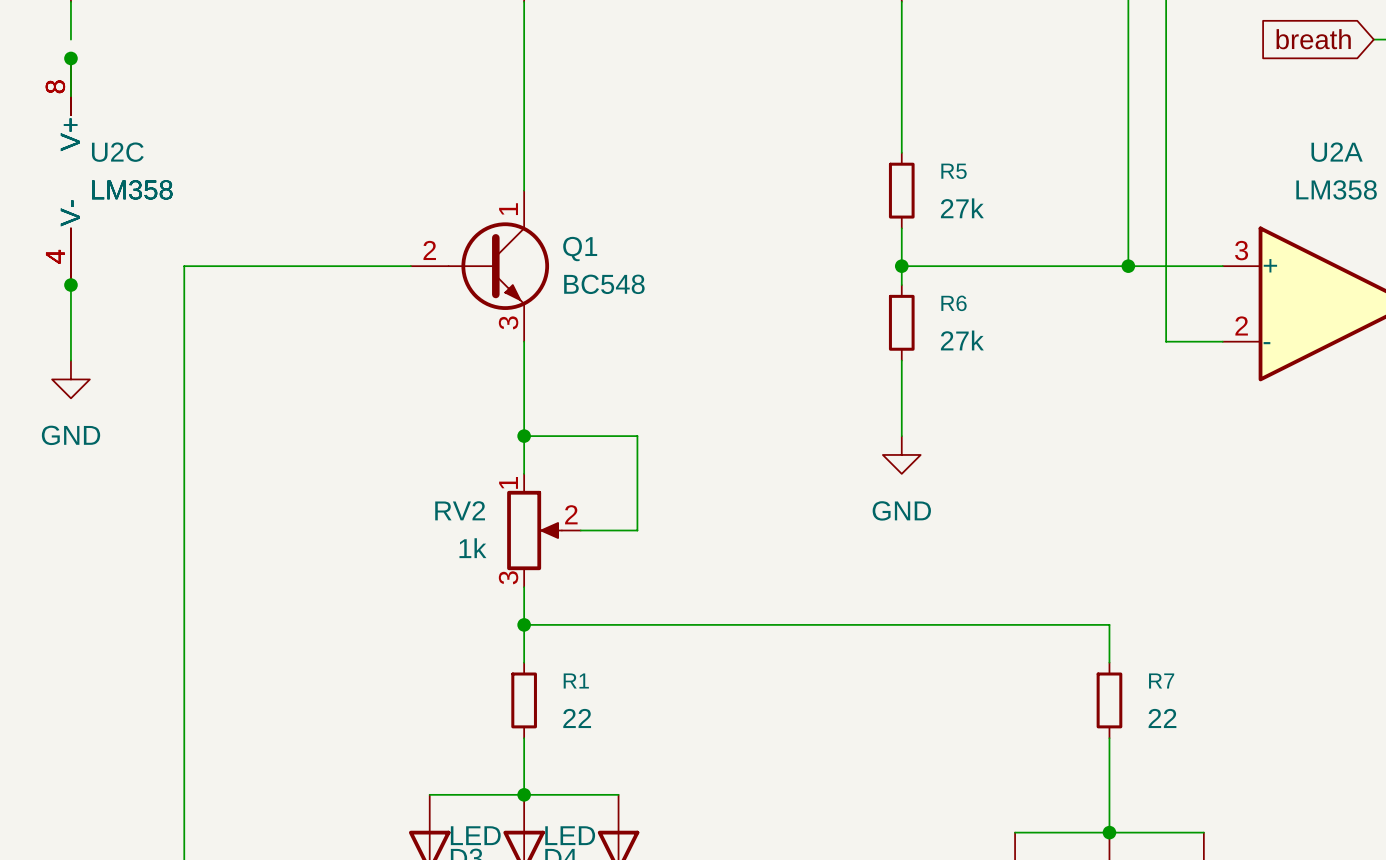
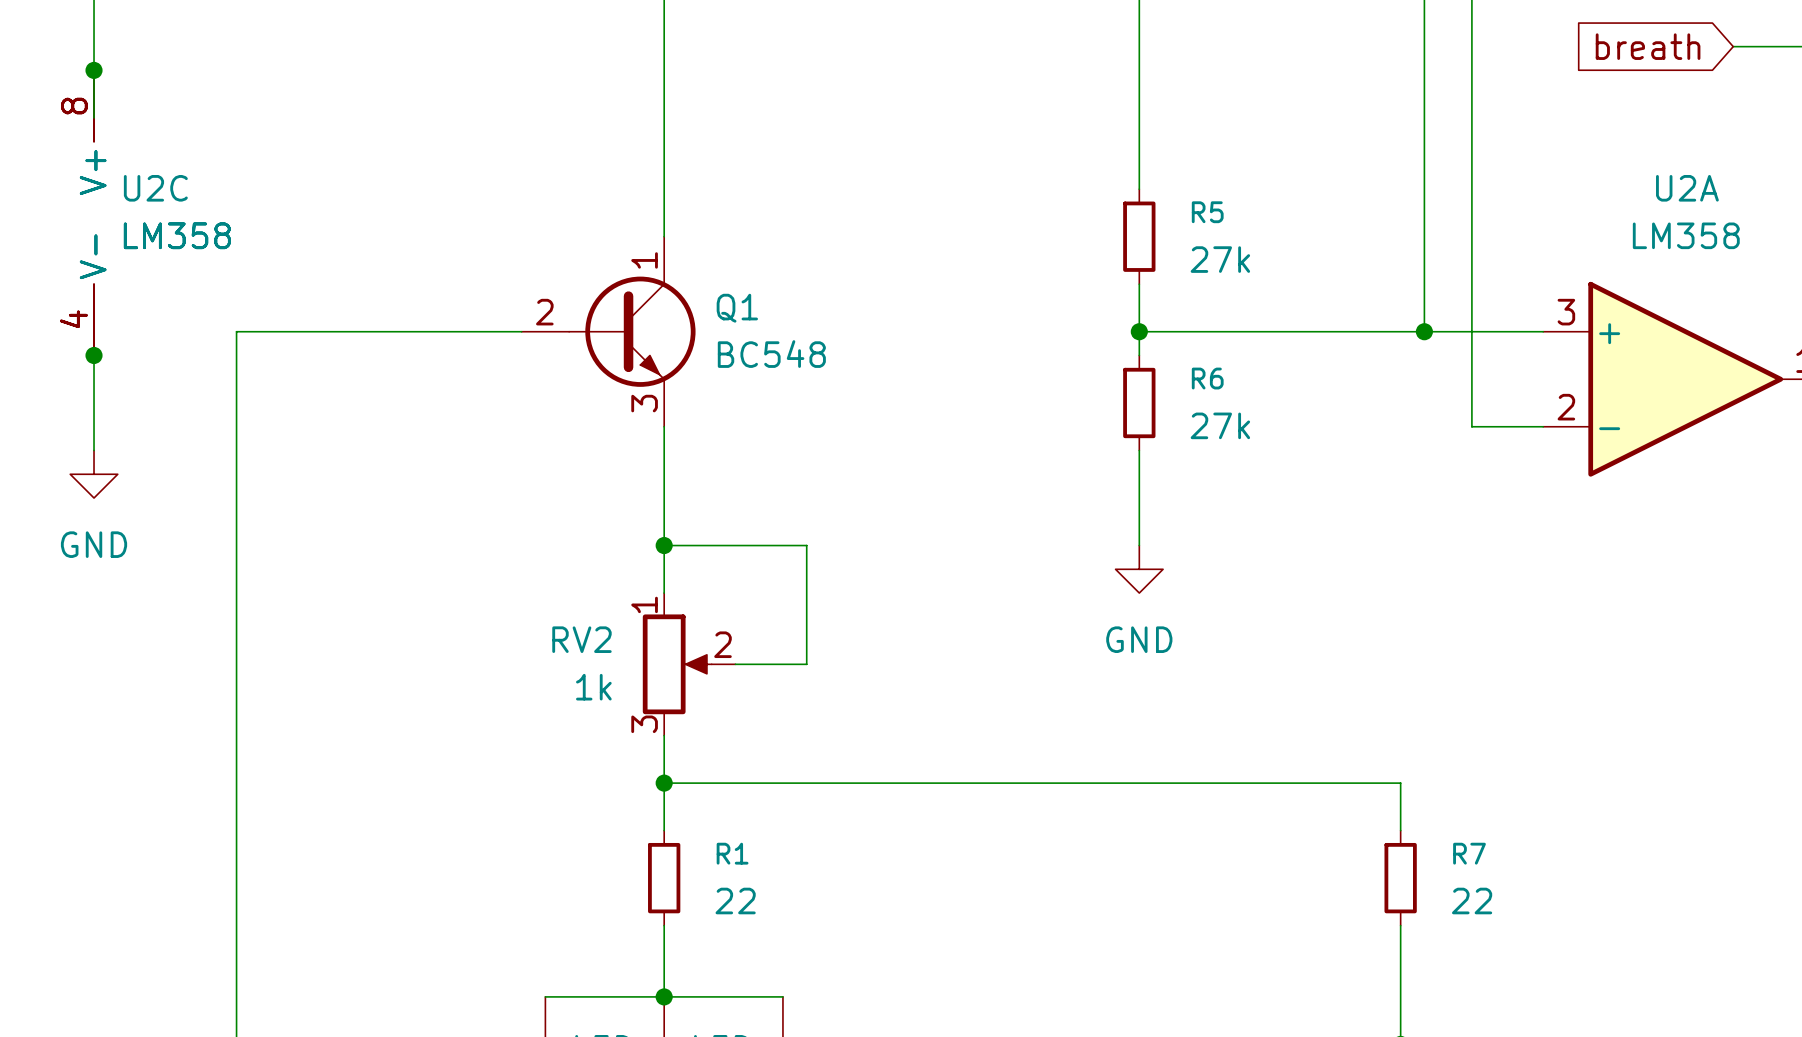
wire: none -> (94, 46) (94, 70)

